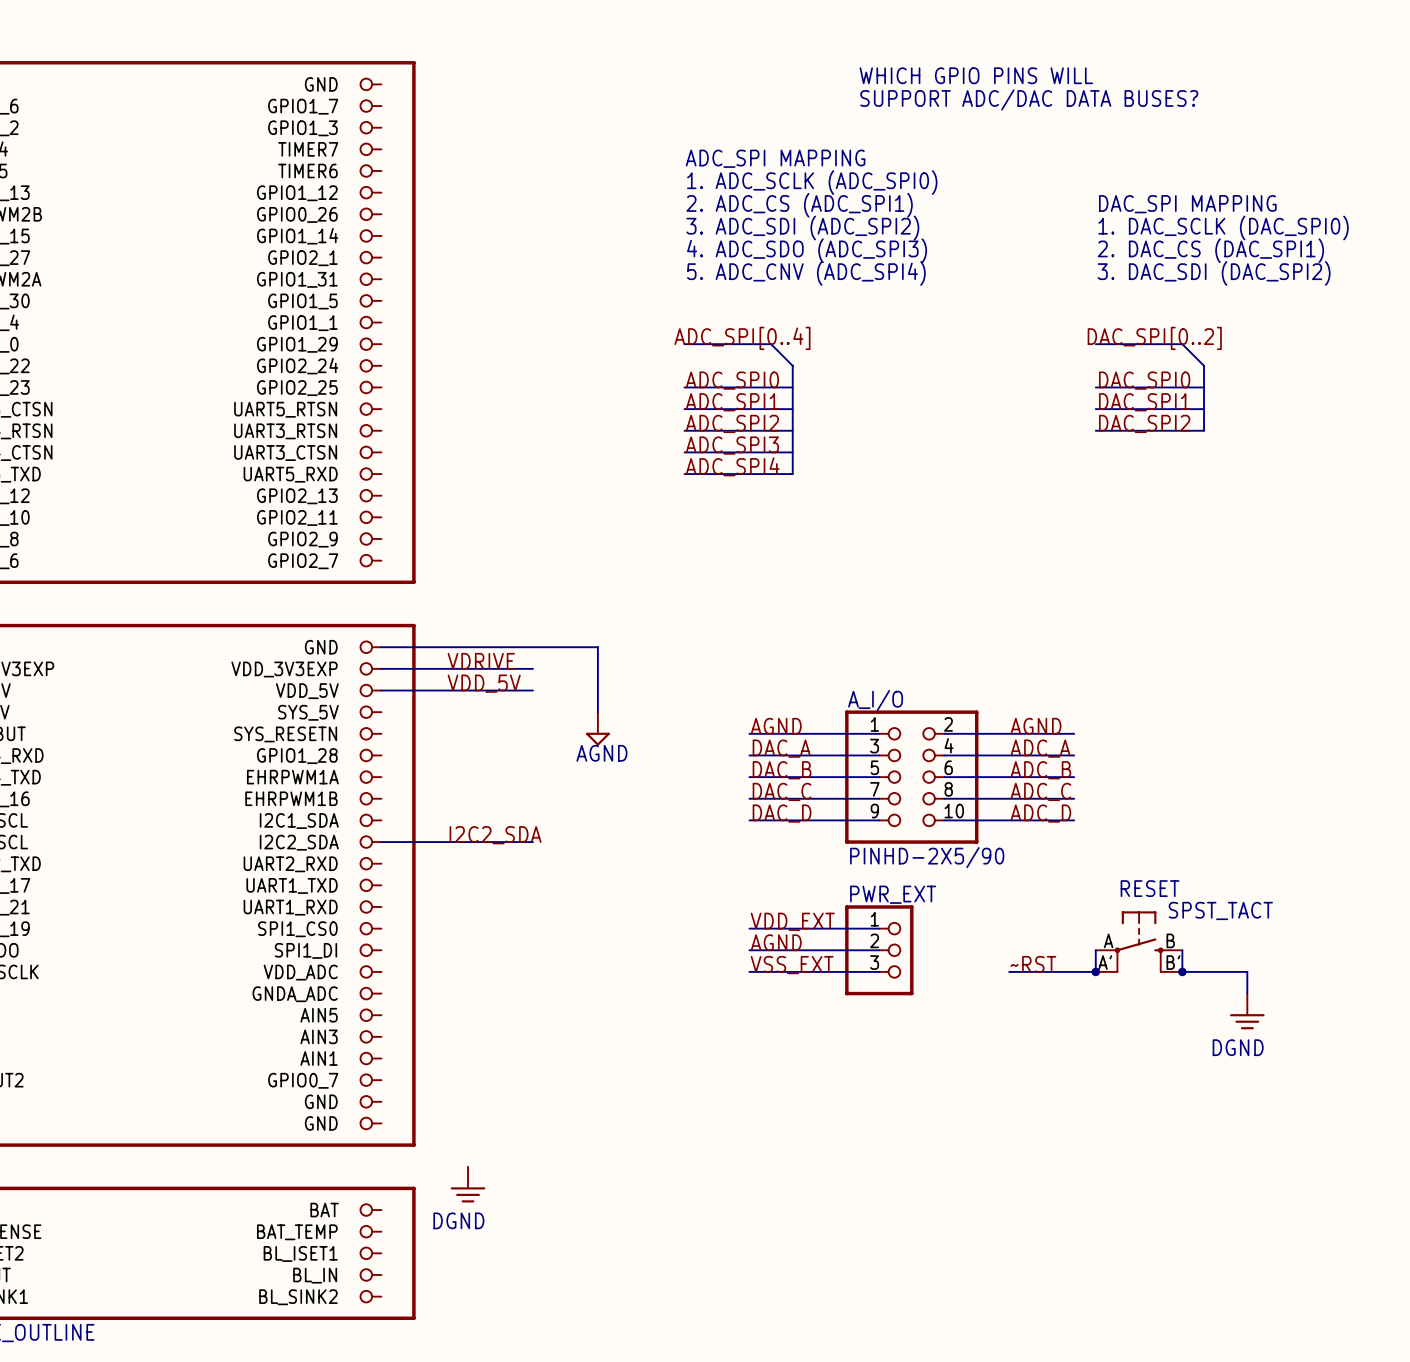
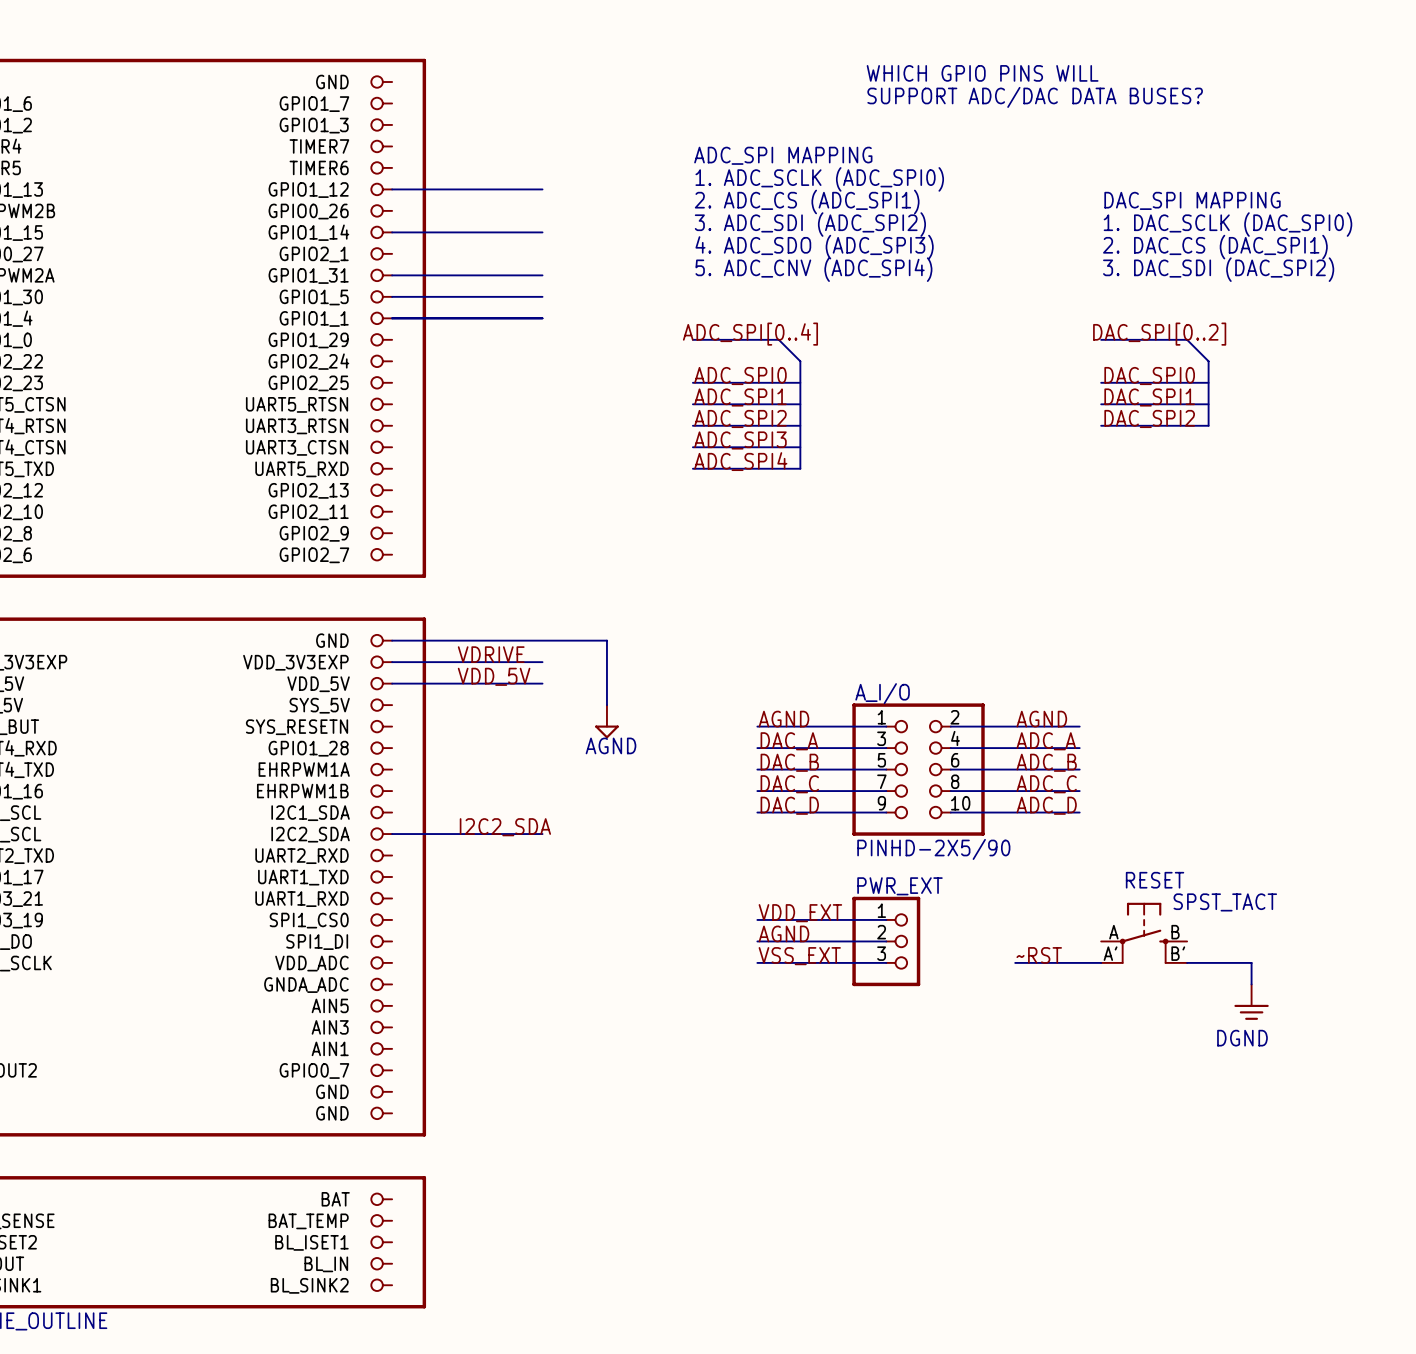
wire: none -> (392, 189) (542, 189)
wire: none -> (392, 232) (542, 232)
wire: none -> (392, 275) (542, 275)
wire: none -> (392, 296) (542, 296)
wire: none -> (392, 318) (542, 318)
wire: (1095, 950) (1095, 971) -> none
wire: (1182, 950) (1182, 971) -> none
junction: (1095, 971) -> none
junction: (1182, 971) -> none
power symbol: DGND (468, 1184) -> none

